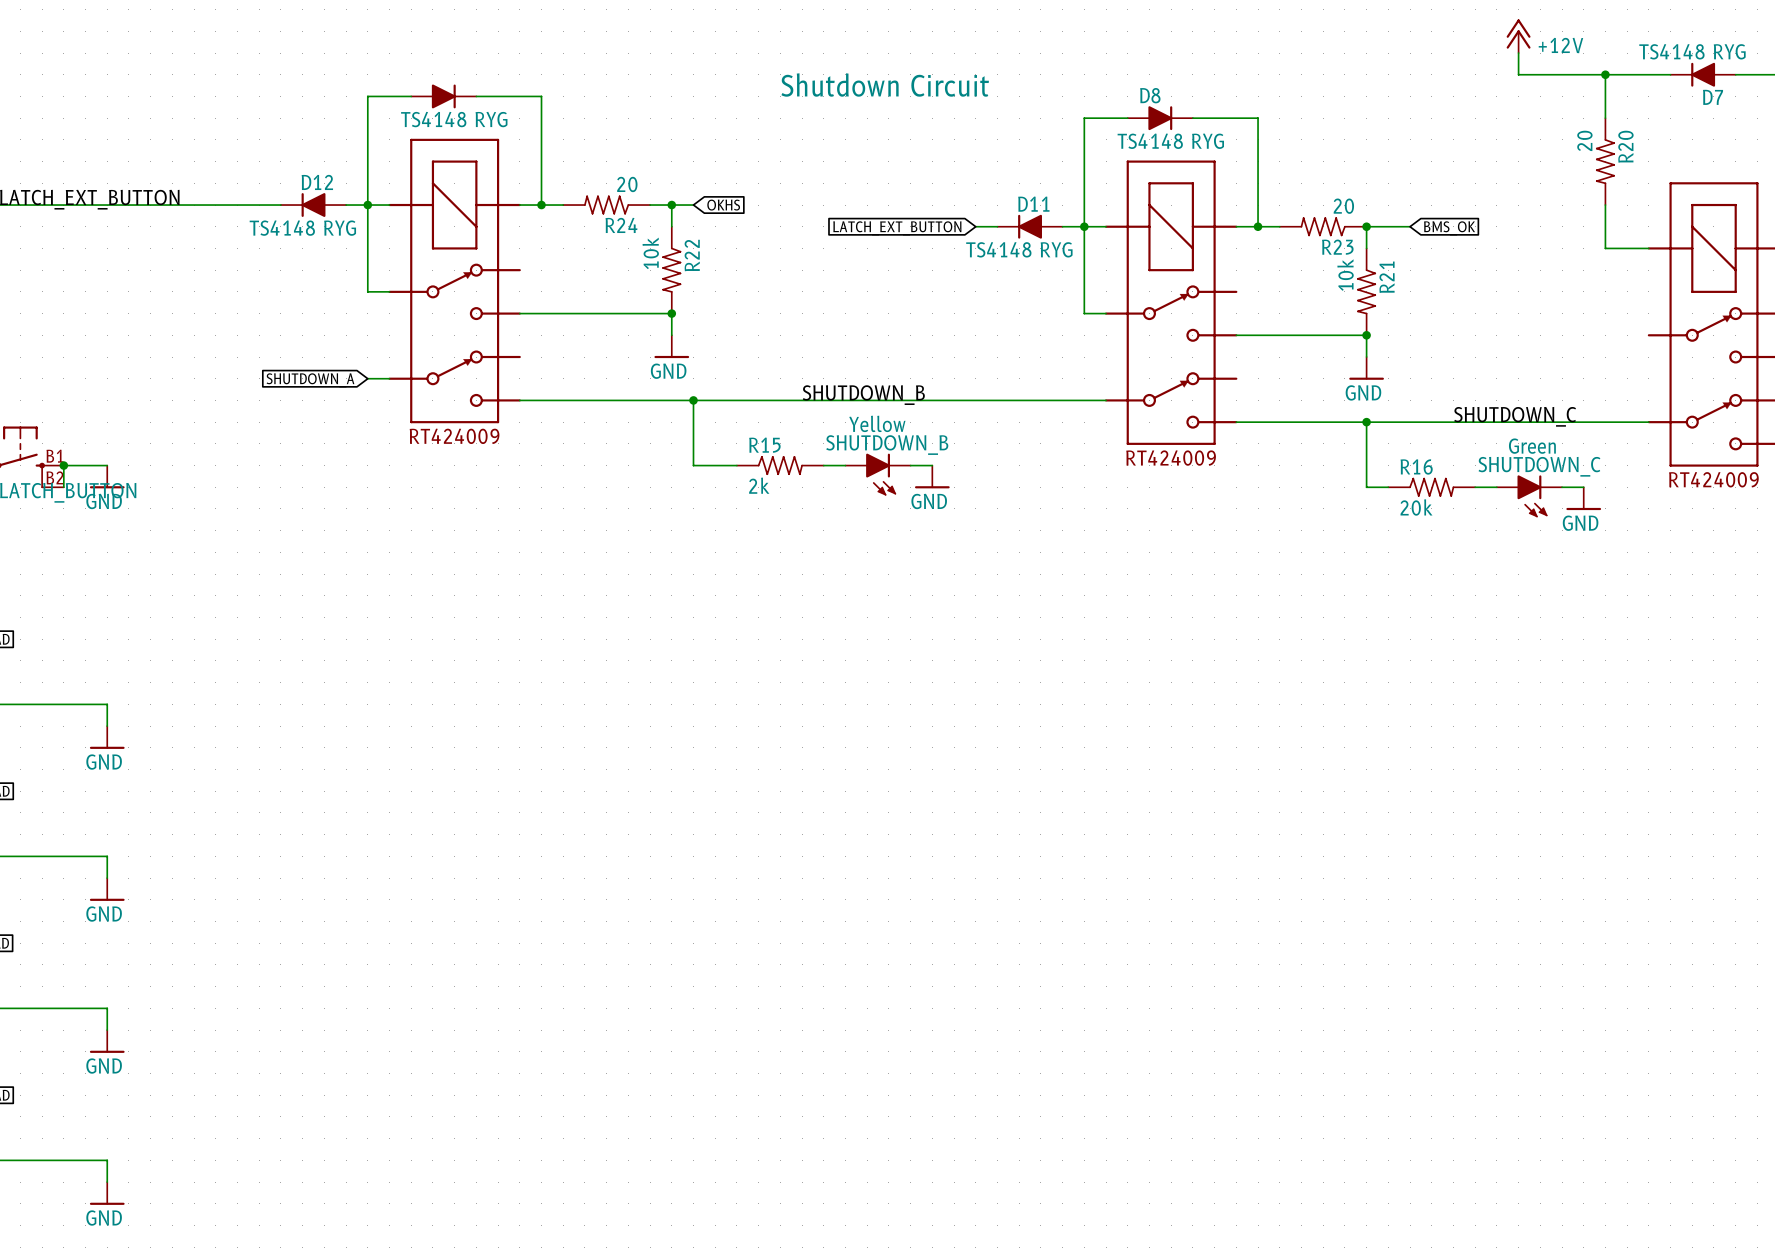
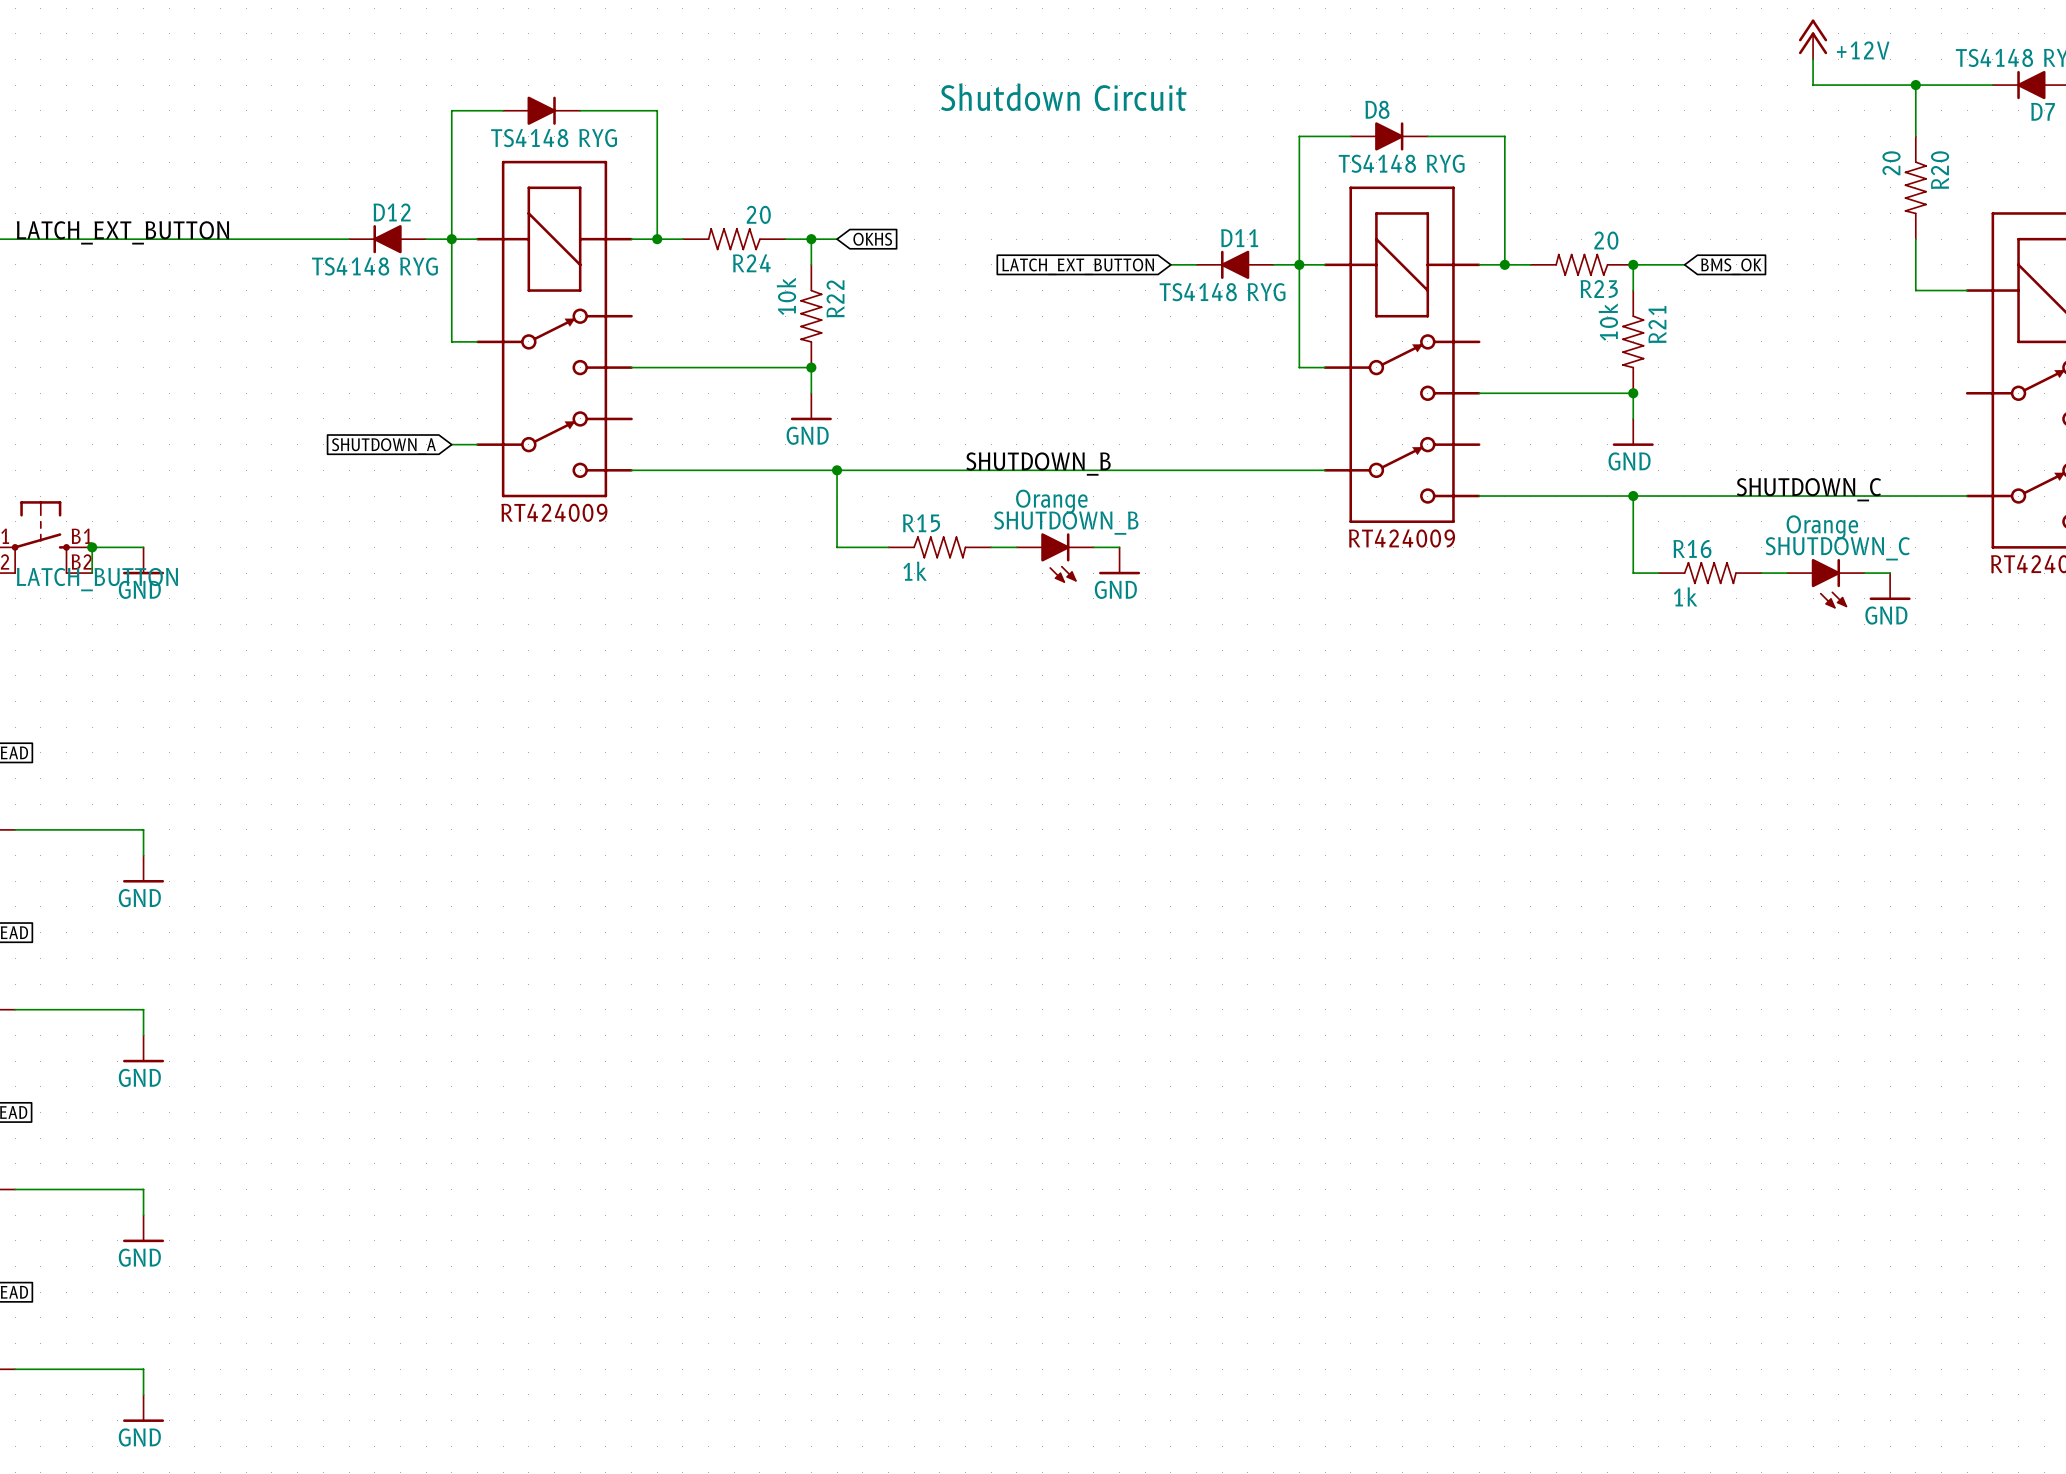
SHUTDOWN_B value: Yellow (877, 423) -> Orange (1051, 501)
SHUTDOWN_C value: Green (1532, 446) -> Orange (1822, 527)
R15 value: 2k (759, 485) -> 1k (915, 571)
R16 value: 20k (1416, 507) -> 1k (1685, 596)

